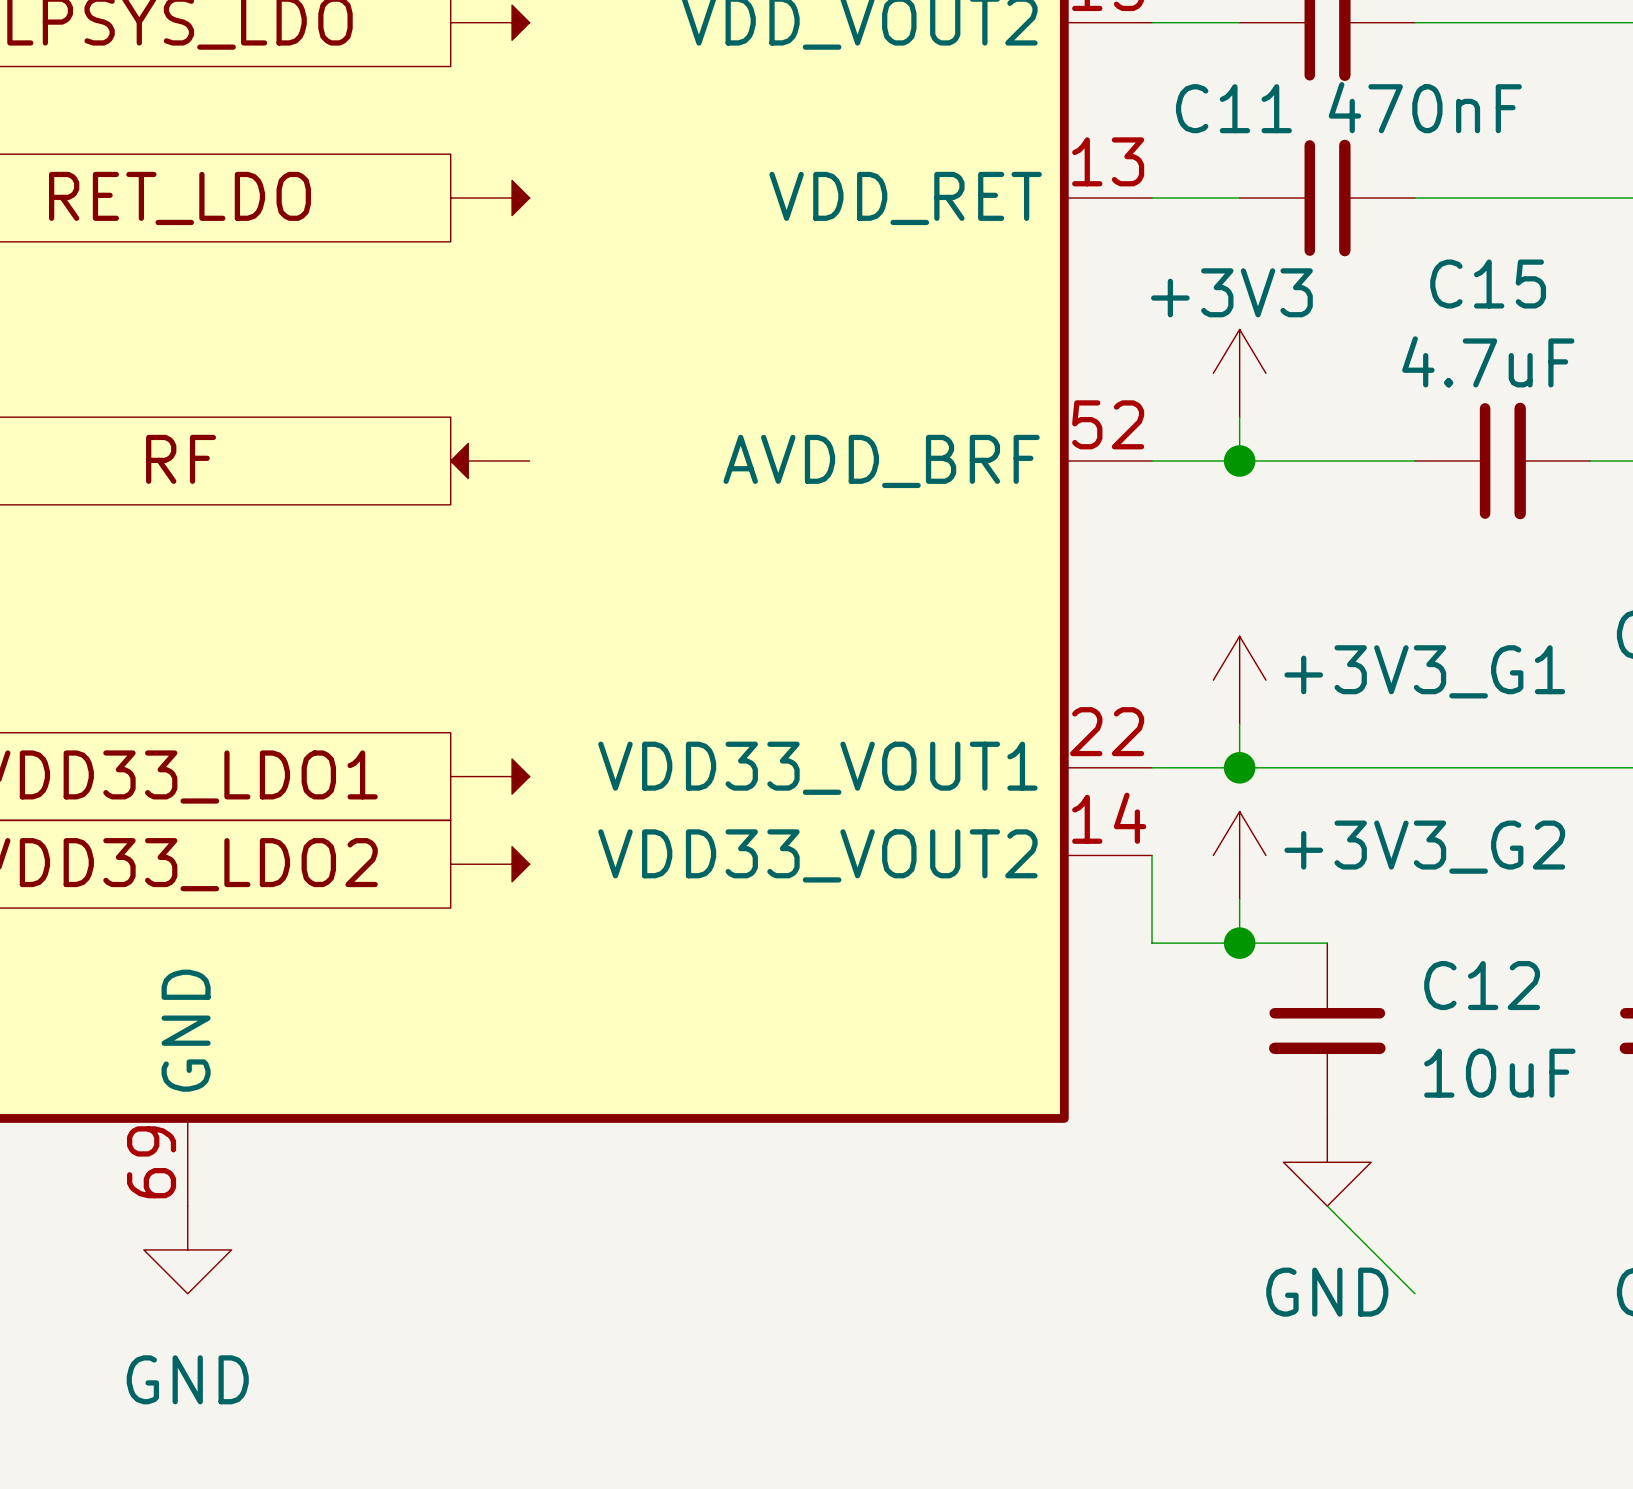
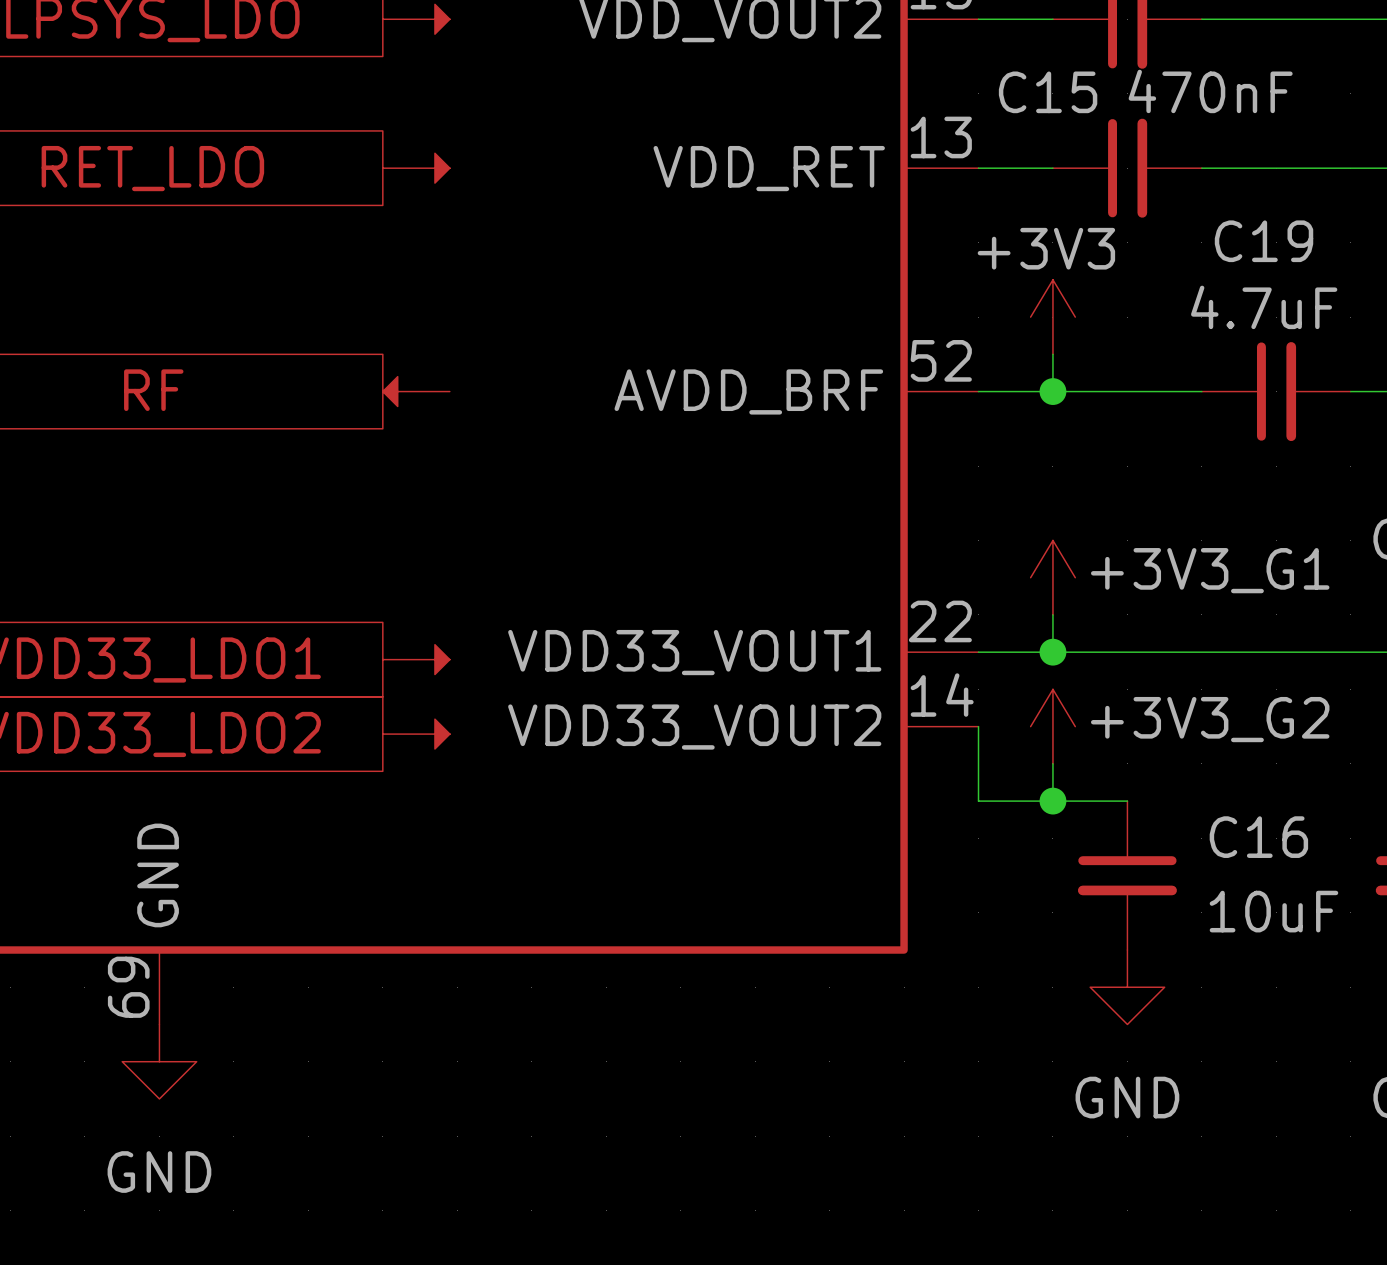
C11 name: C11 (1233, 108) -> C15 (1048, 92)
C15 name: C15 (1488, 284) -> C19 (1264, 241)
C12 name: C12 (1482, 985) -> C16 (1258, 837)
wire: (1327, 1206) (1414, 1293) -> none

